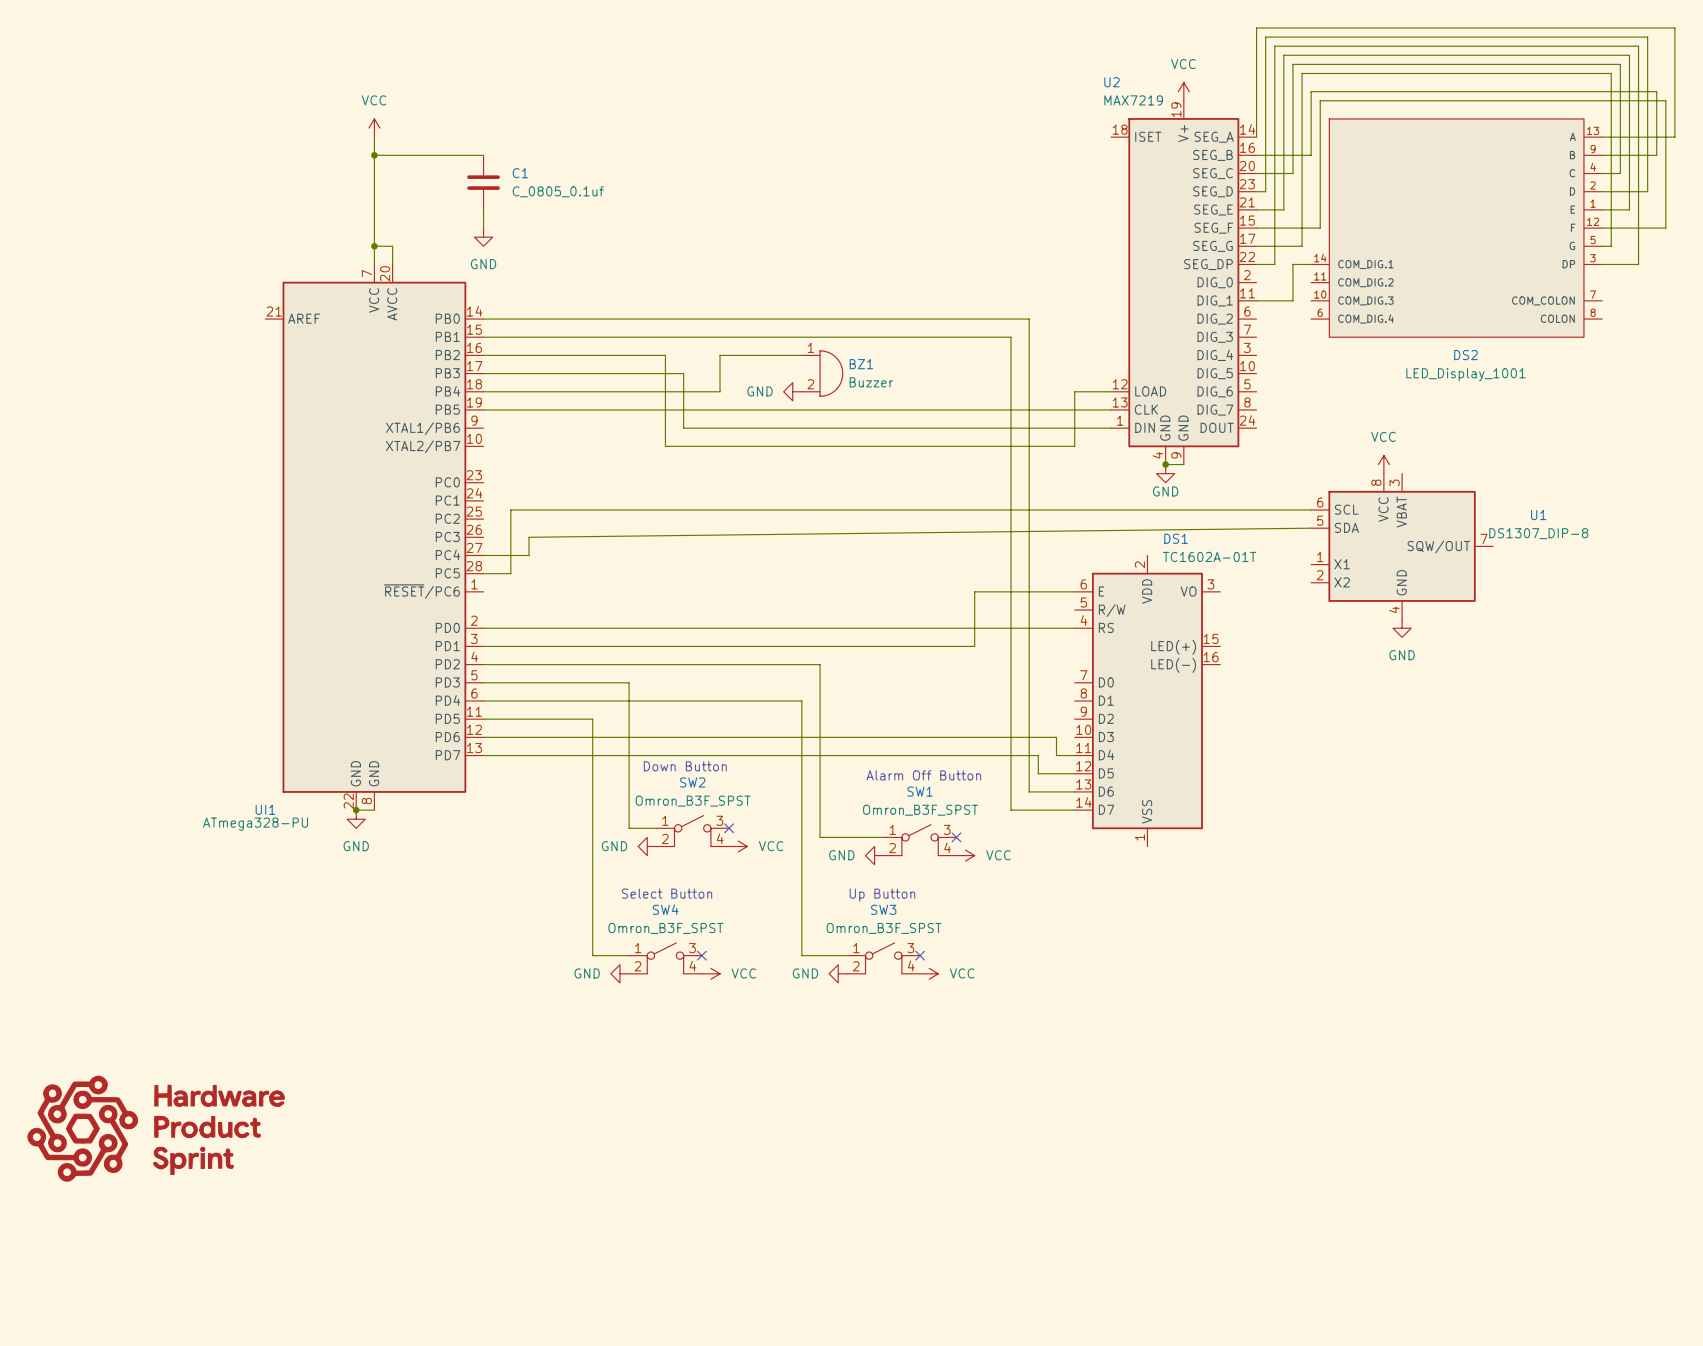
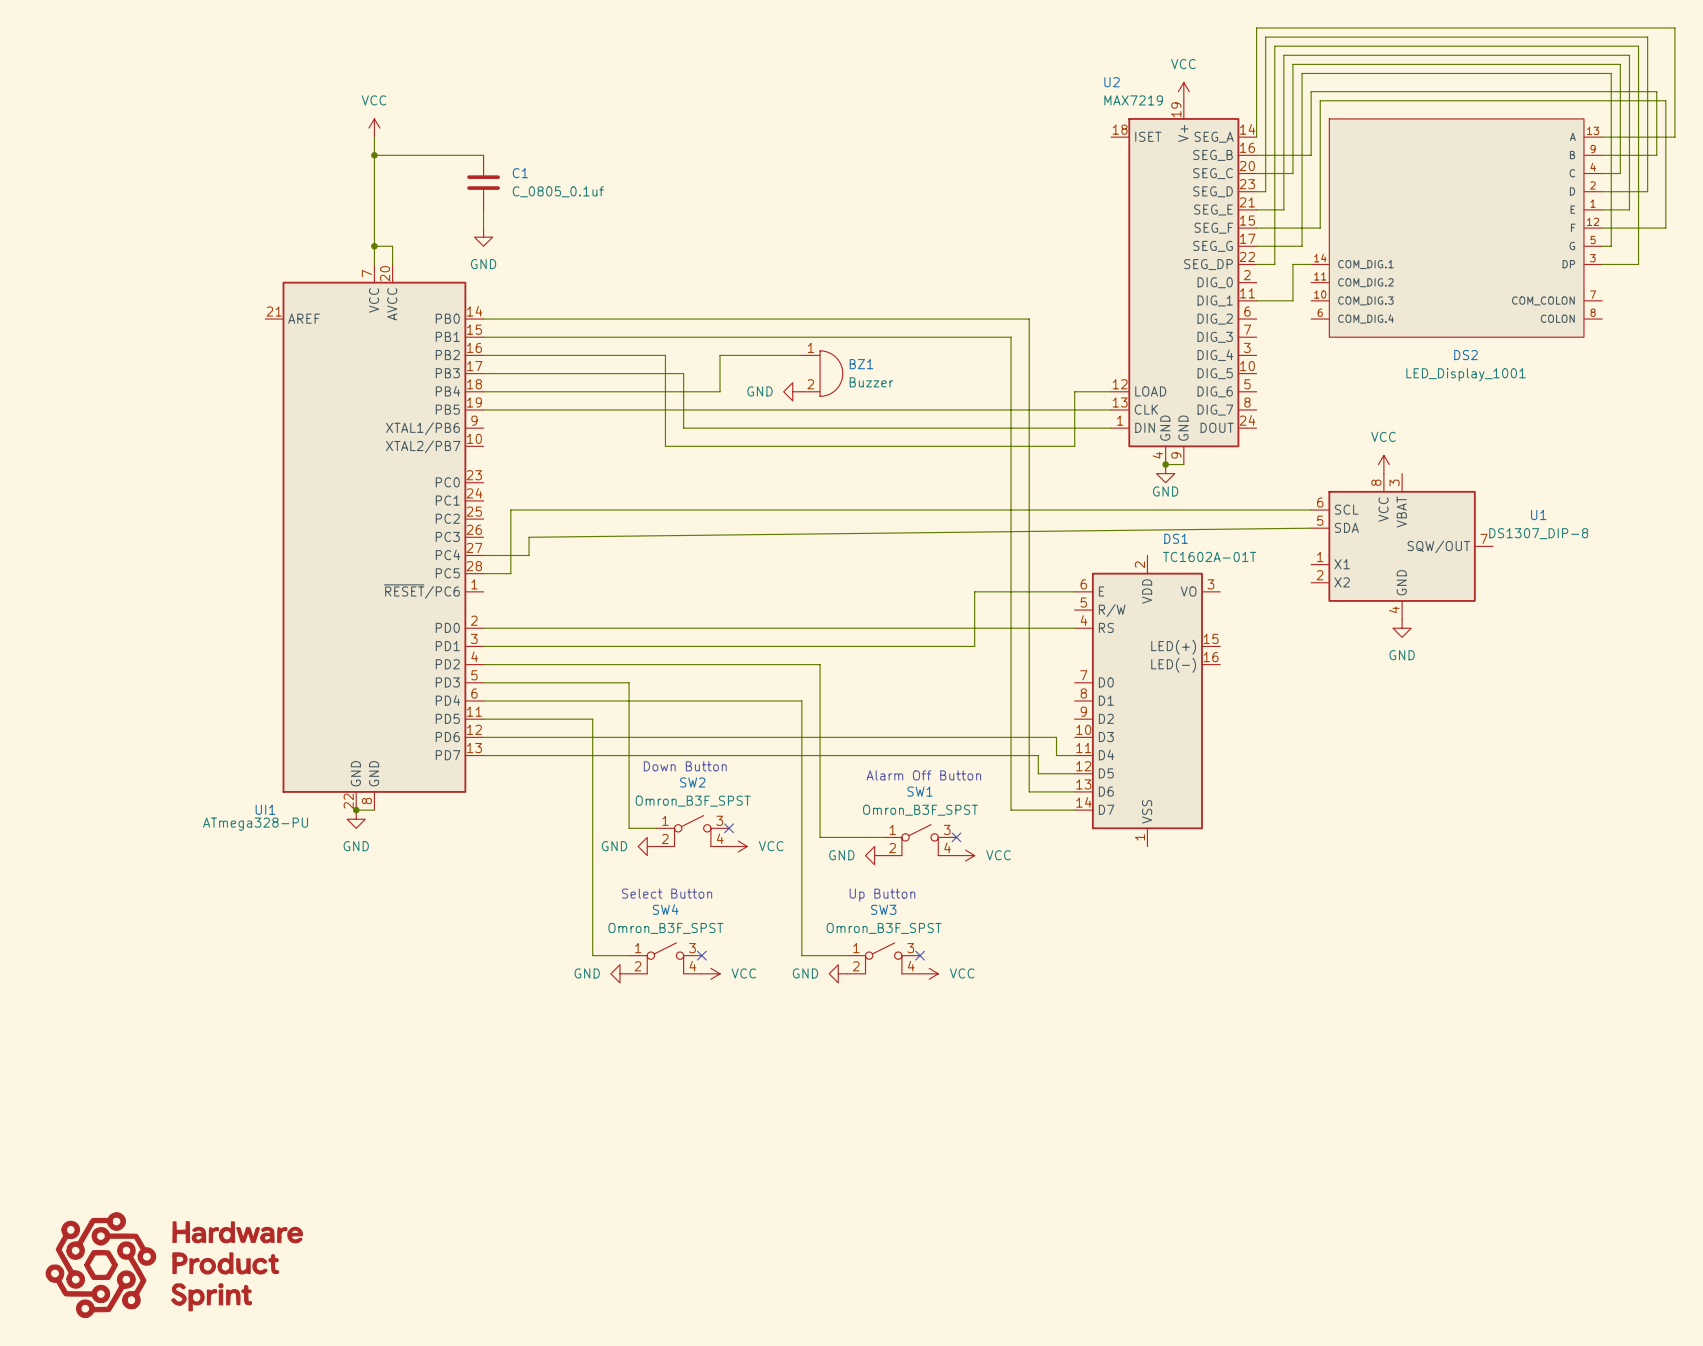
power symbol position: (156, 1128) -> (174, 1265)

